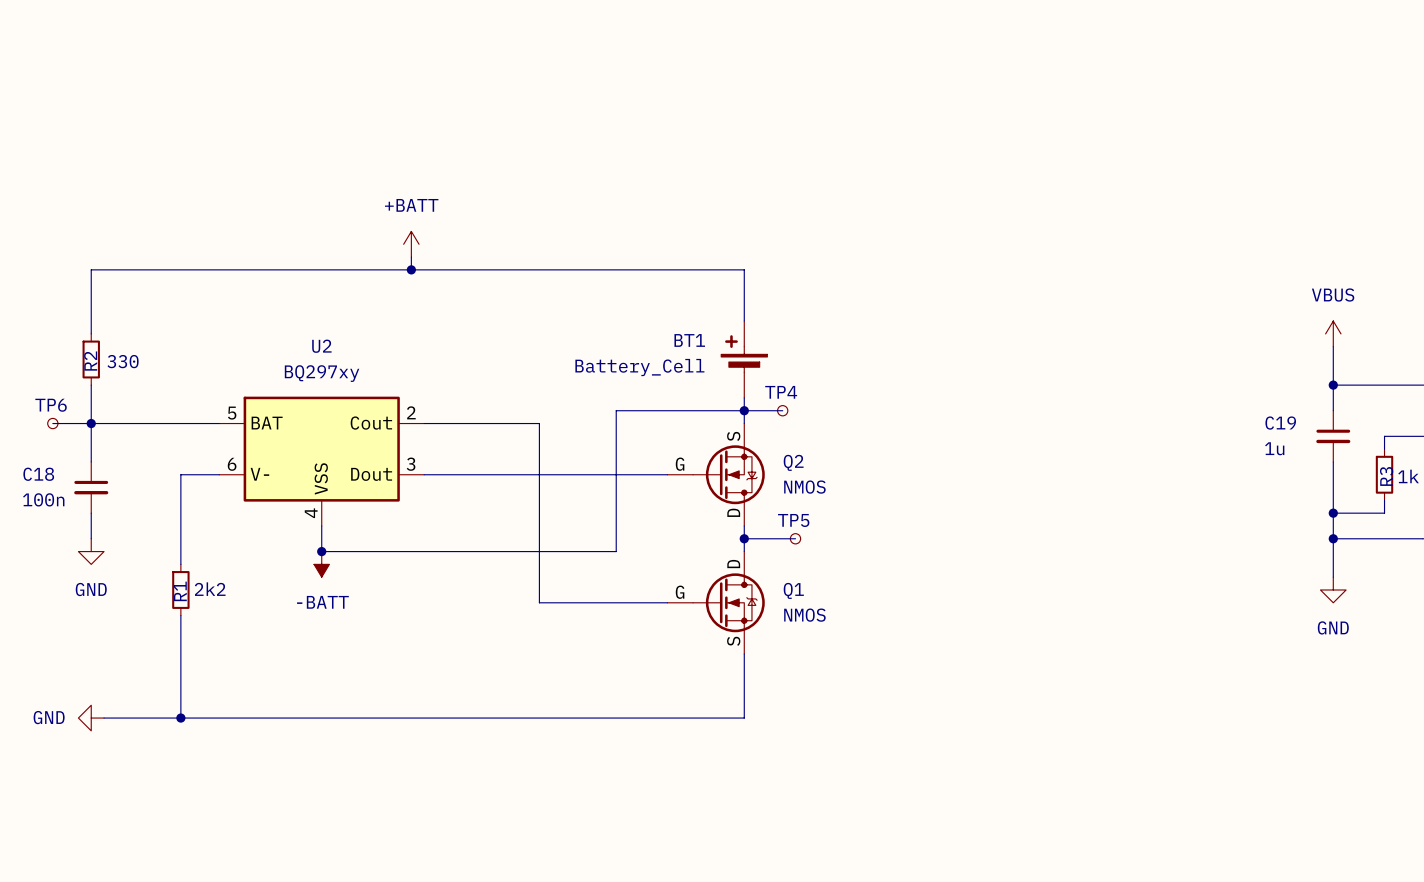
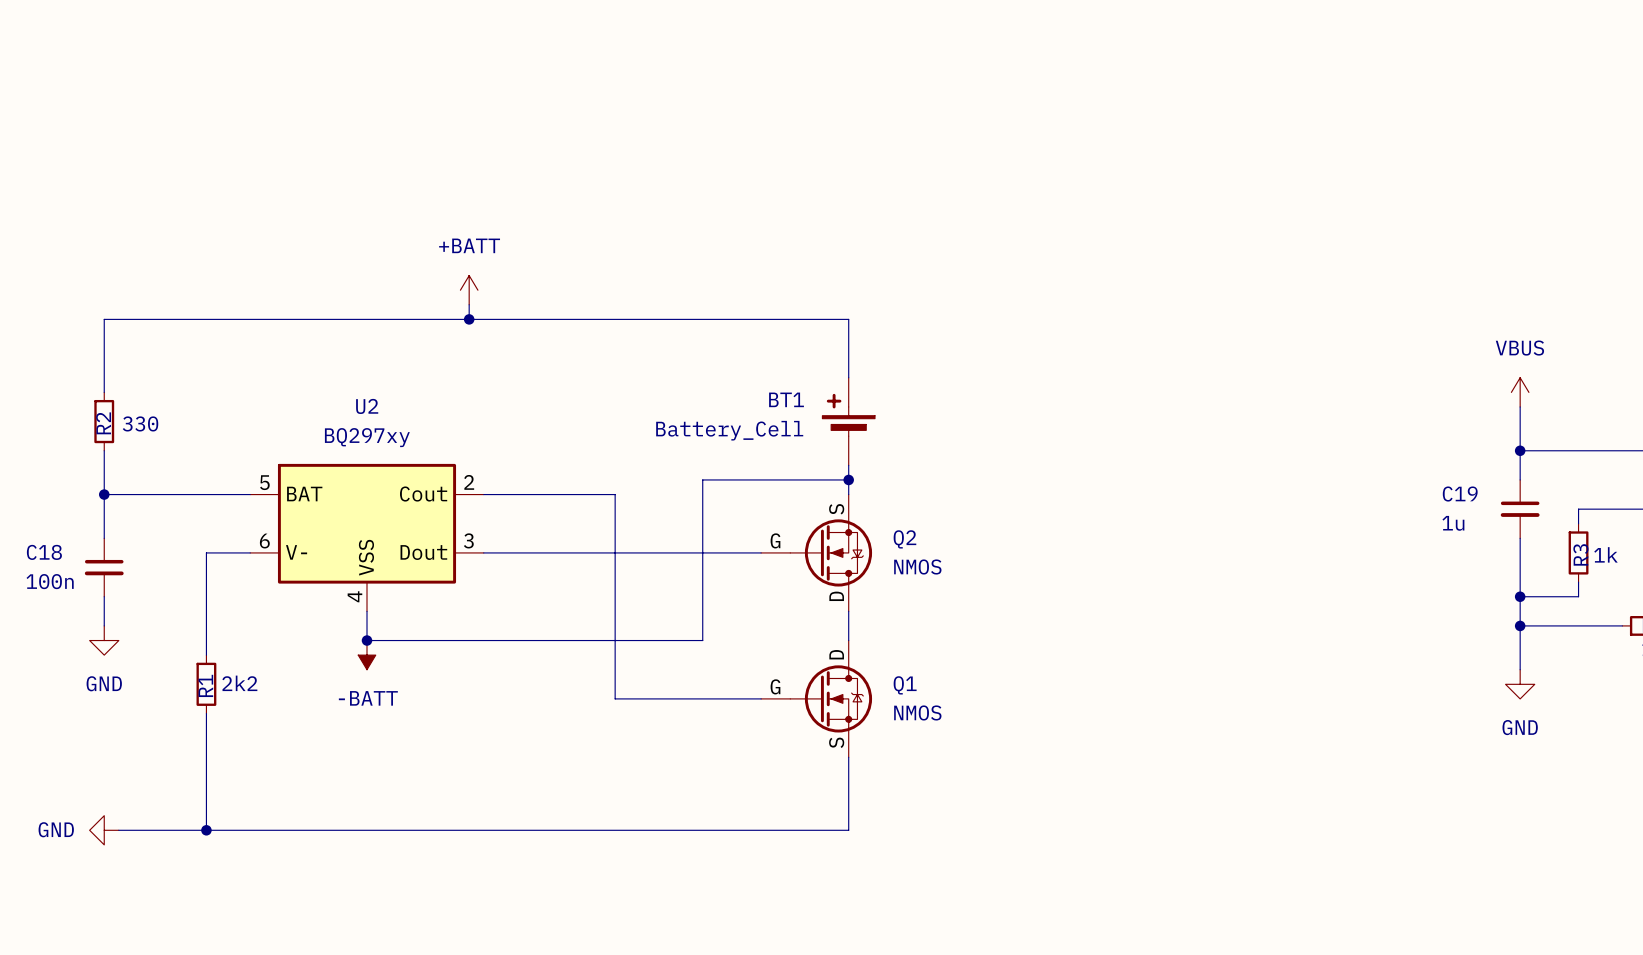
wire: (744, 410) (782, 410) -> none
TP4: (782, 410) -> none
wire: (52, 423) (91, 423) -> none
TP6: (52, 423) -> none
wire: (744, 538) (795, 538) -> none
junction: (744, 538) -> none
TP5: (795, 538) -> none

